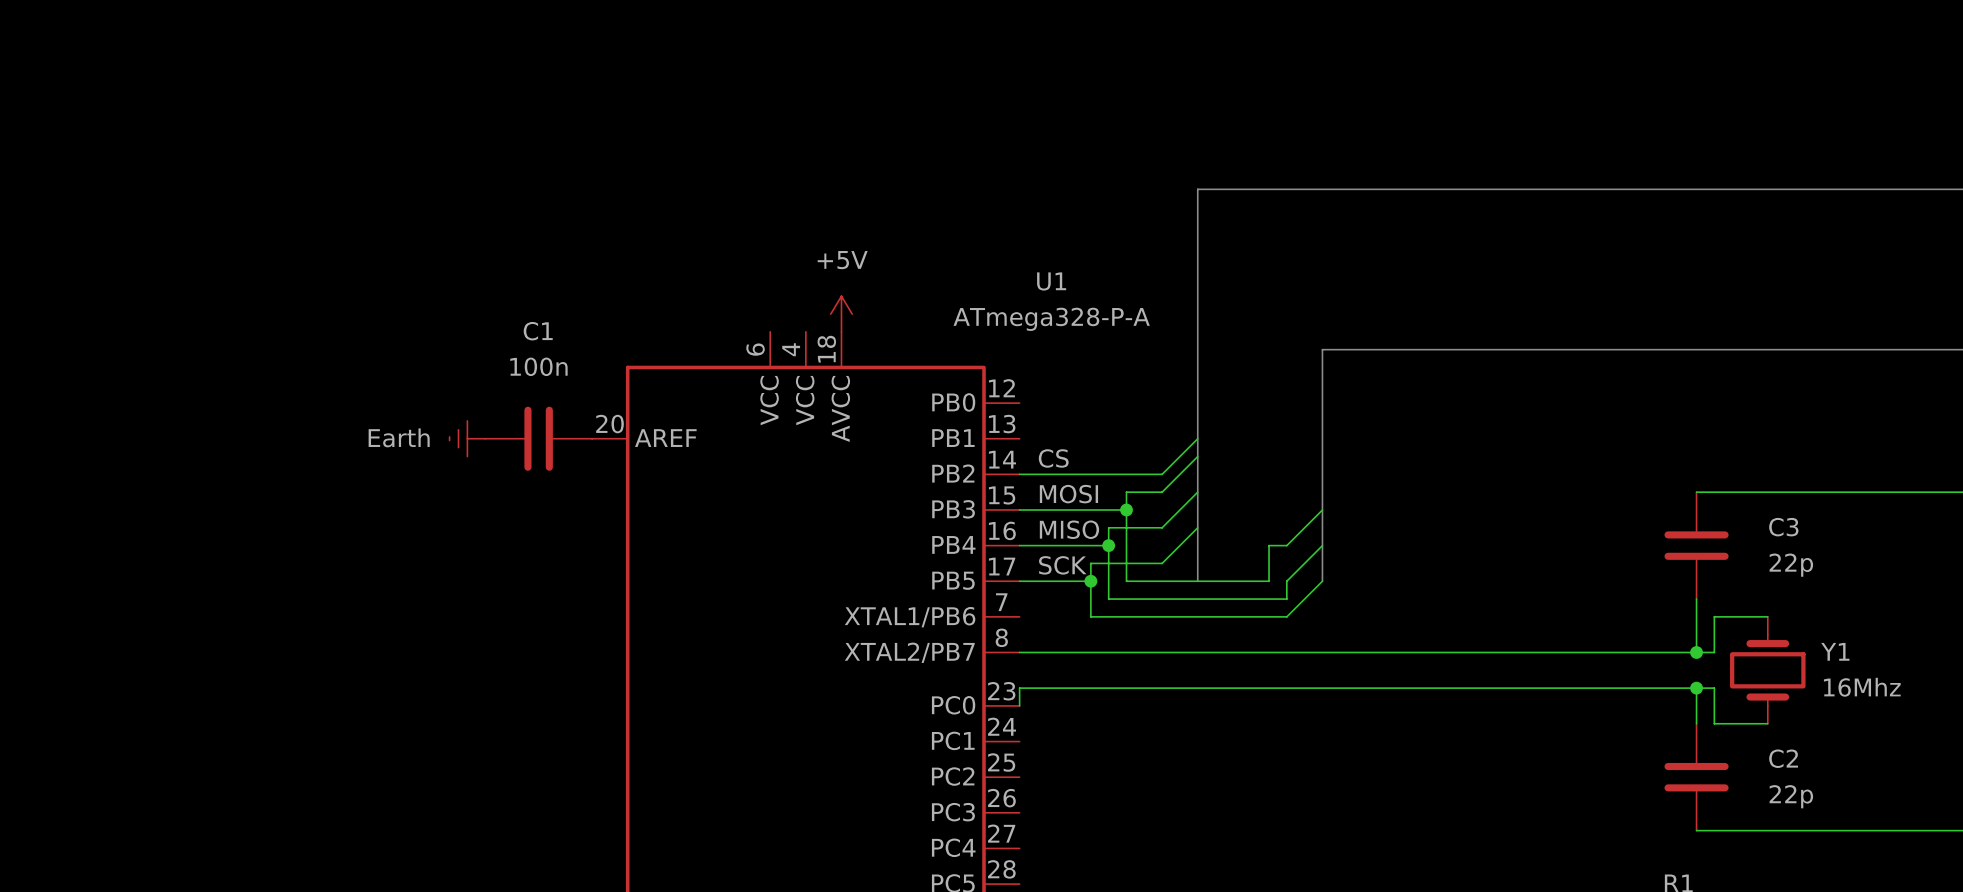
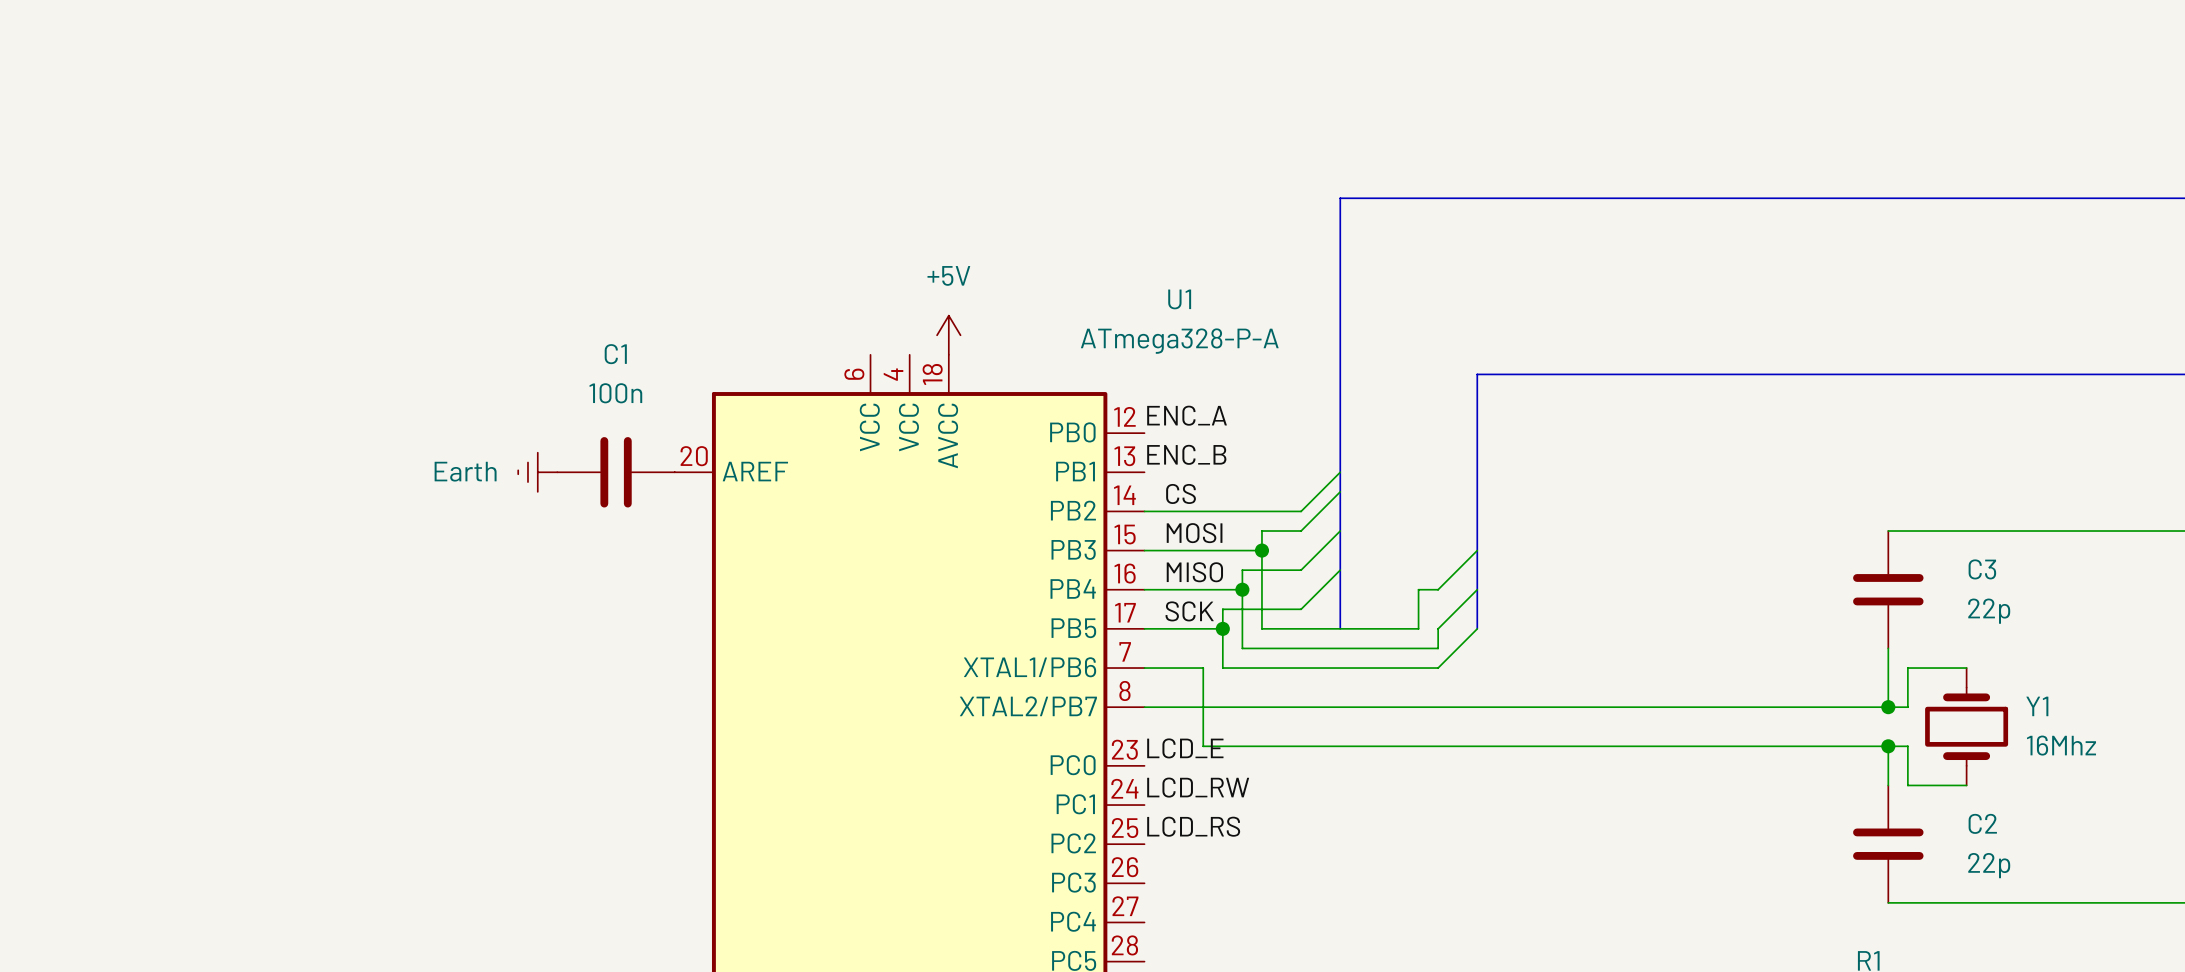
label: none -> ENC_A (1187, 415)
label: none -> ENC_B (1186, 454)
wire: (1073, 688) (1019, 688) (1019, 705) -> (1203, 746) (1203, 668) (1144, 668)
label: none -> LCD_E (1185, 748)
label: none -> LCD_RW (1198, 787)
label: none -> LCD_RS (1193, 826)

